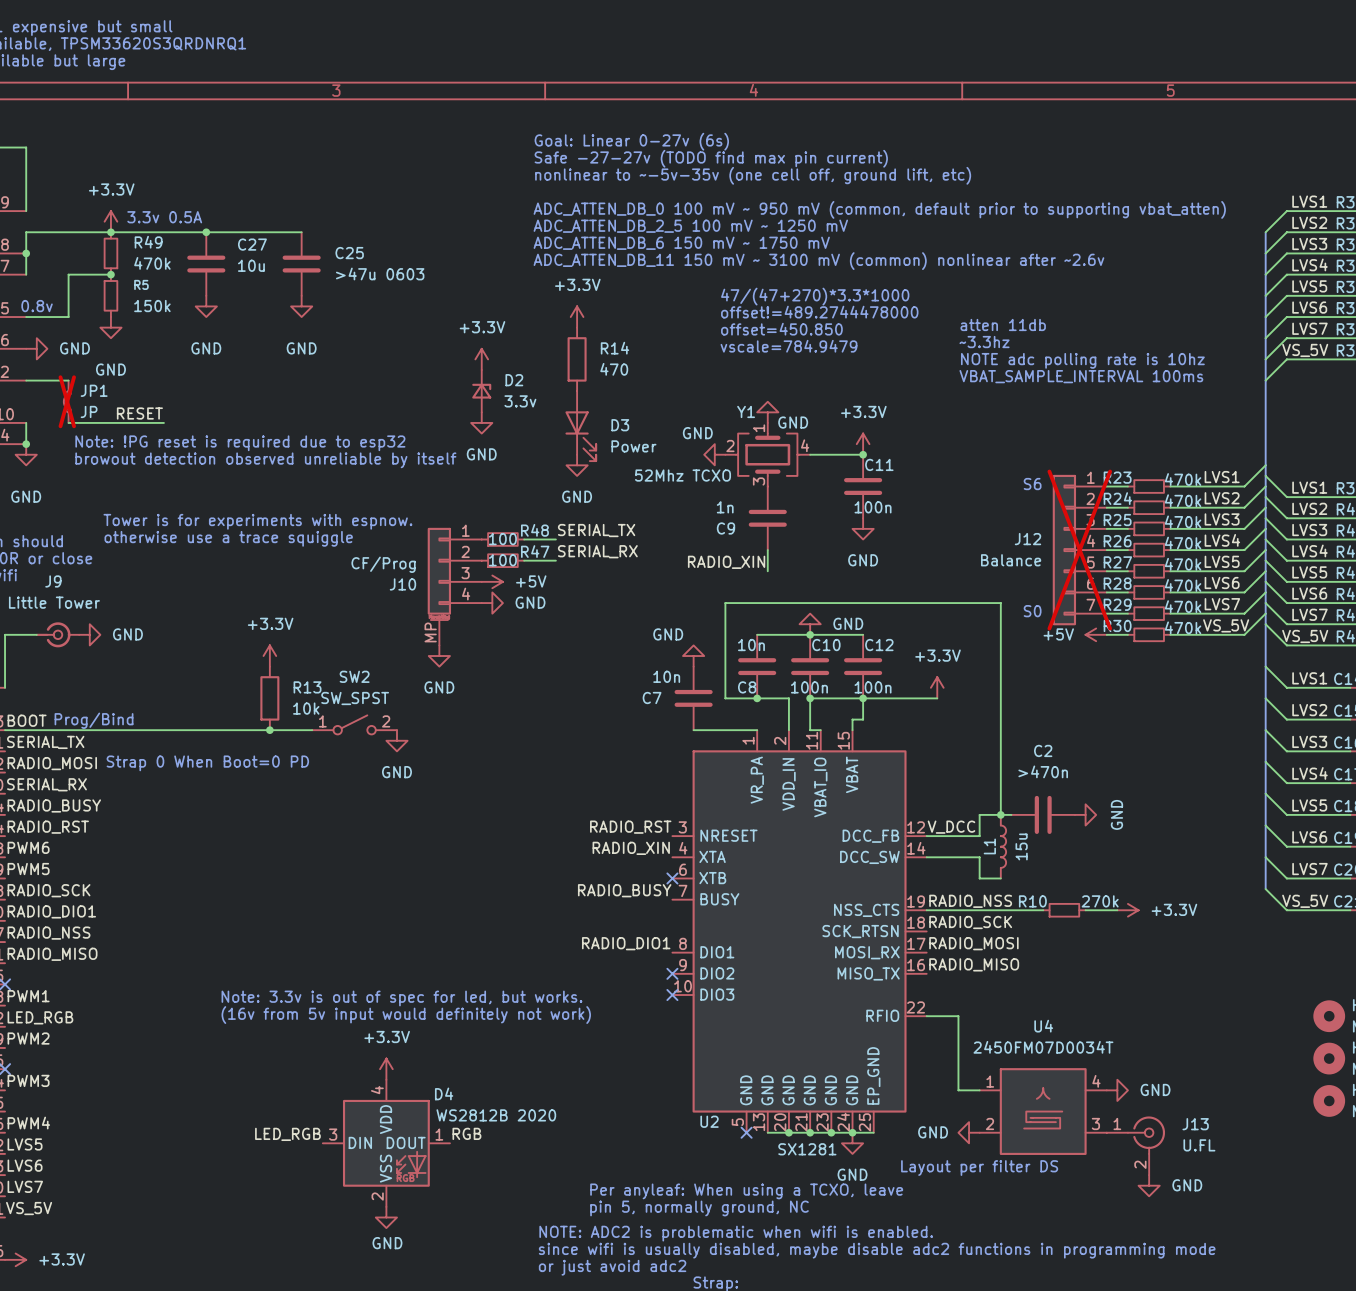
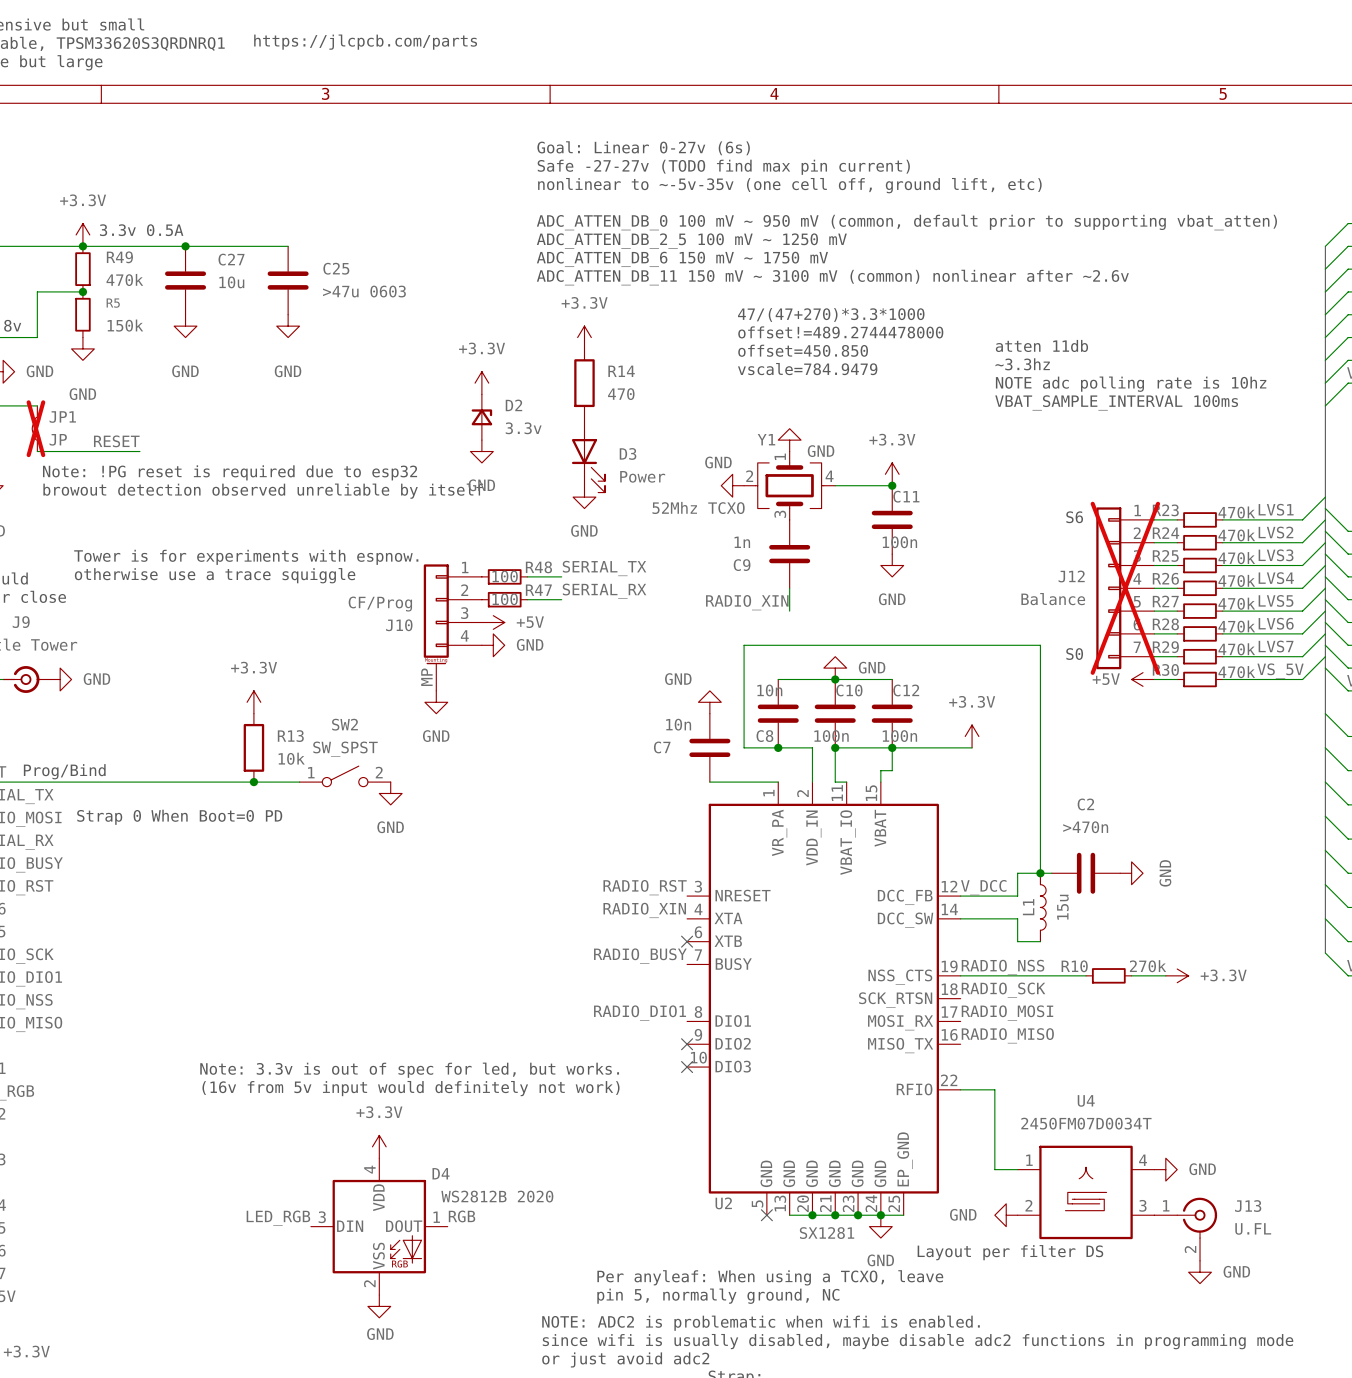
text: none -> https://jlcpcb.com/parts (365, 42)

